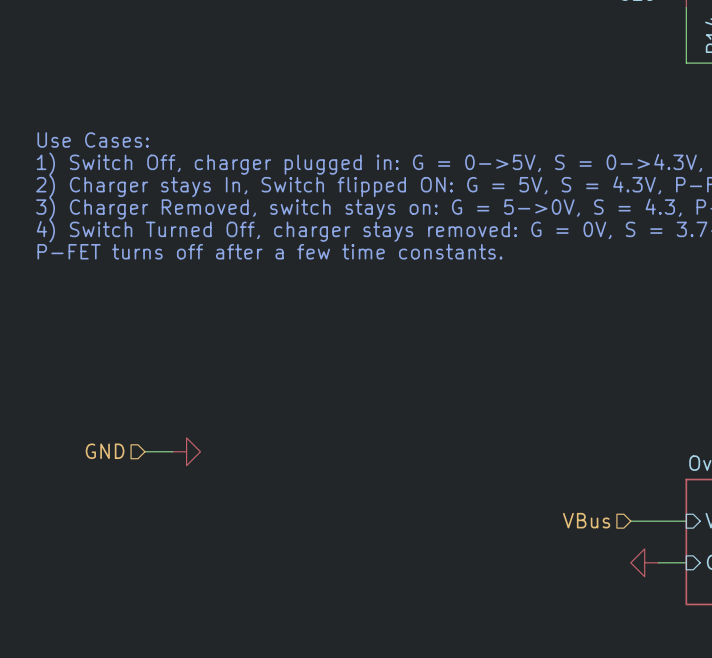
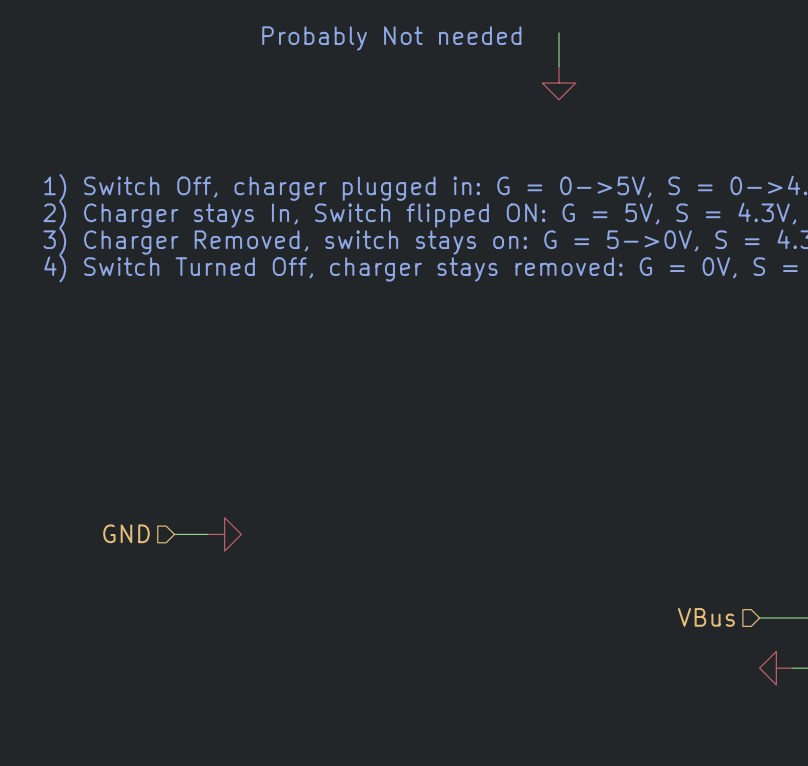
wire: none -> (559, 32) (559, 66)
text: none -> Probably Not needed (391, 38)
power symbol: none -> (559, 83)
text: Use Cases: (93, 140) -> none
text: P-FET turns off after a few time constants. (269, 251) -> none

